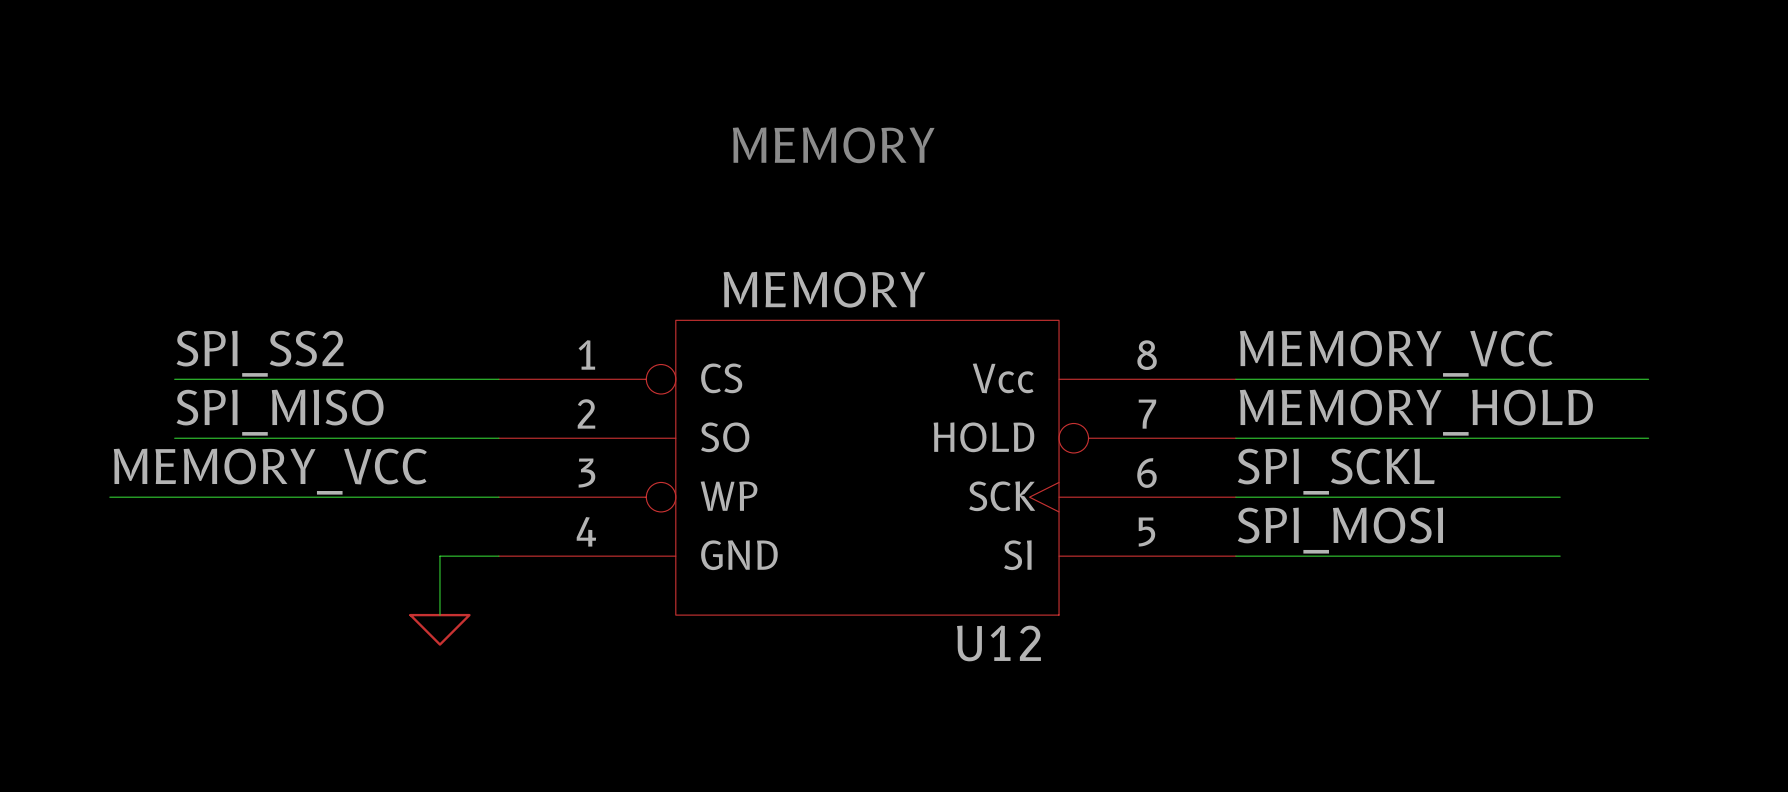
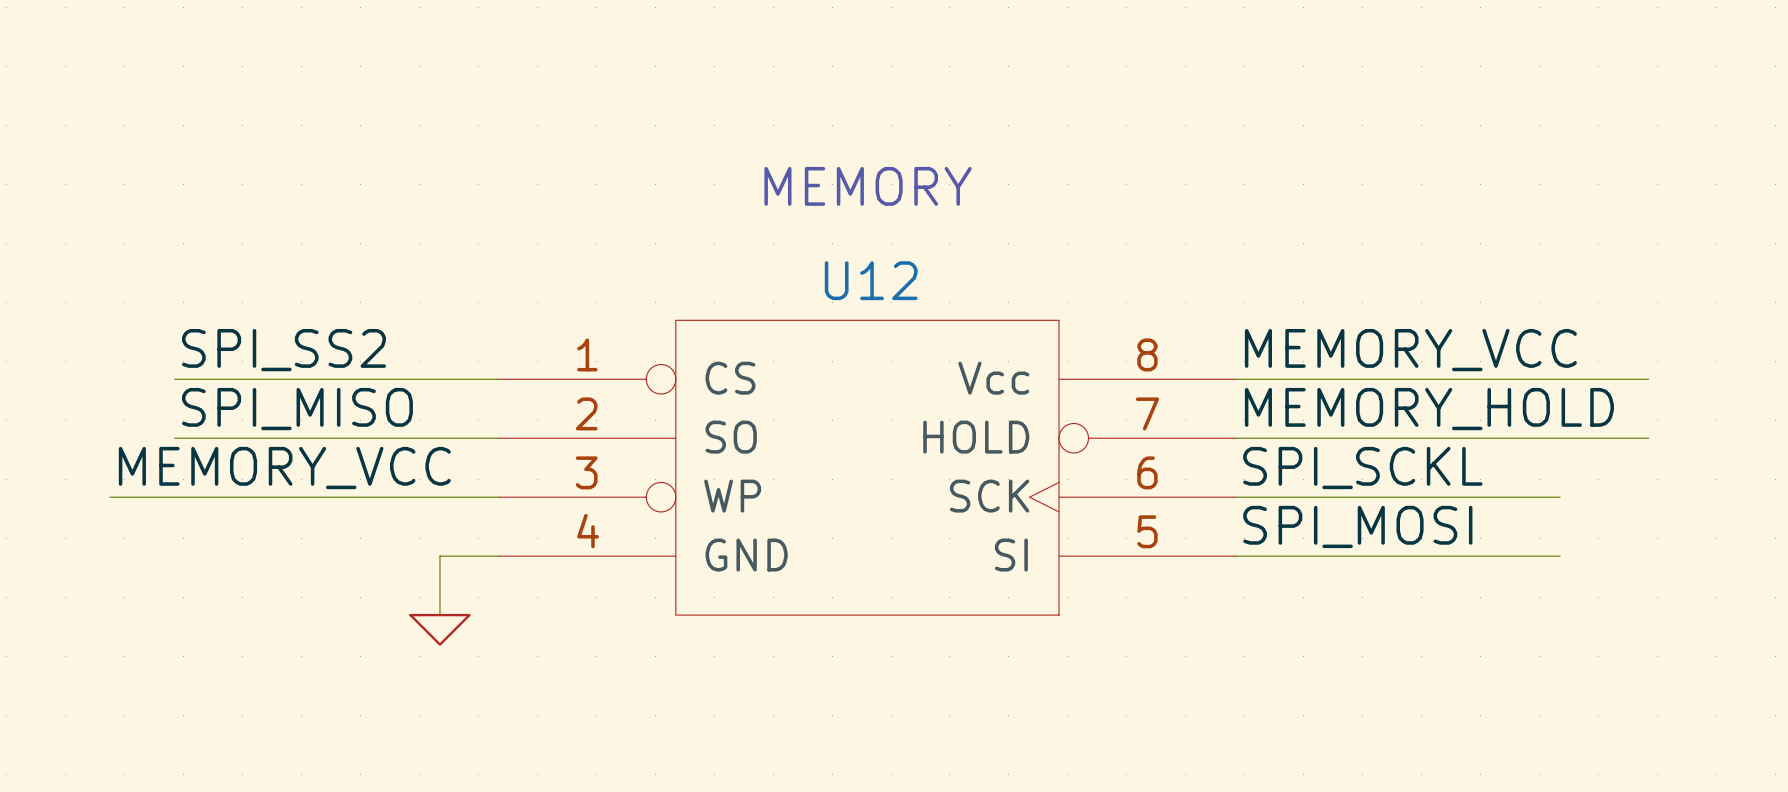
text position: MEMORY (833, 145) -> MEMORY (868, 186)
U12 value: MEMORY (824, 289) -> none
U12 name position: U12 (998, 643) -> U12 (871, 280)

